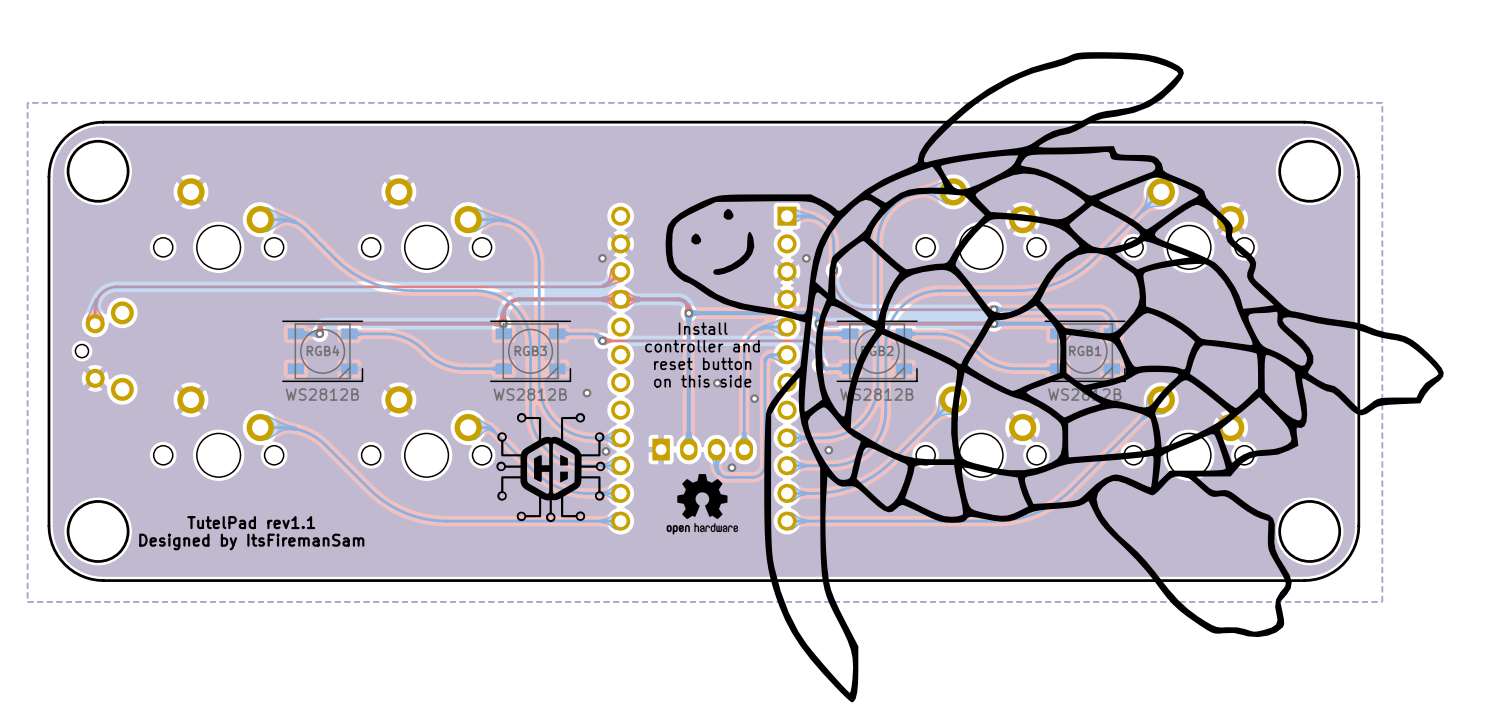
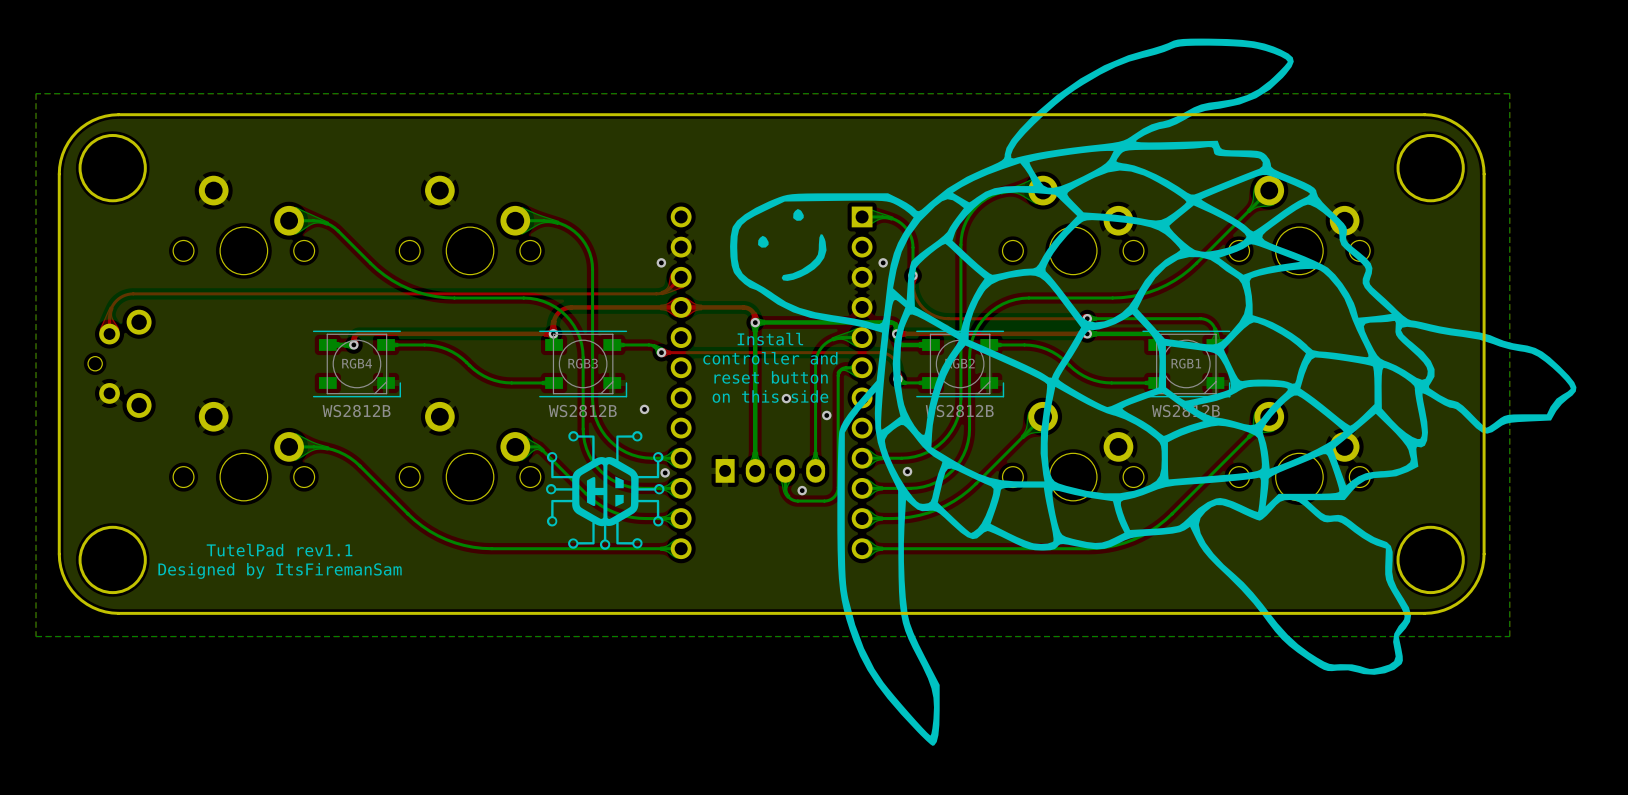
drawing: [666, 474, 739, 535] -> none

